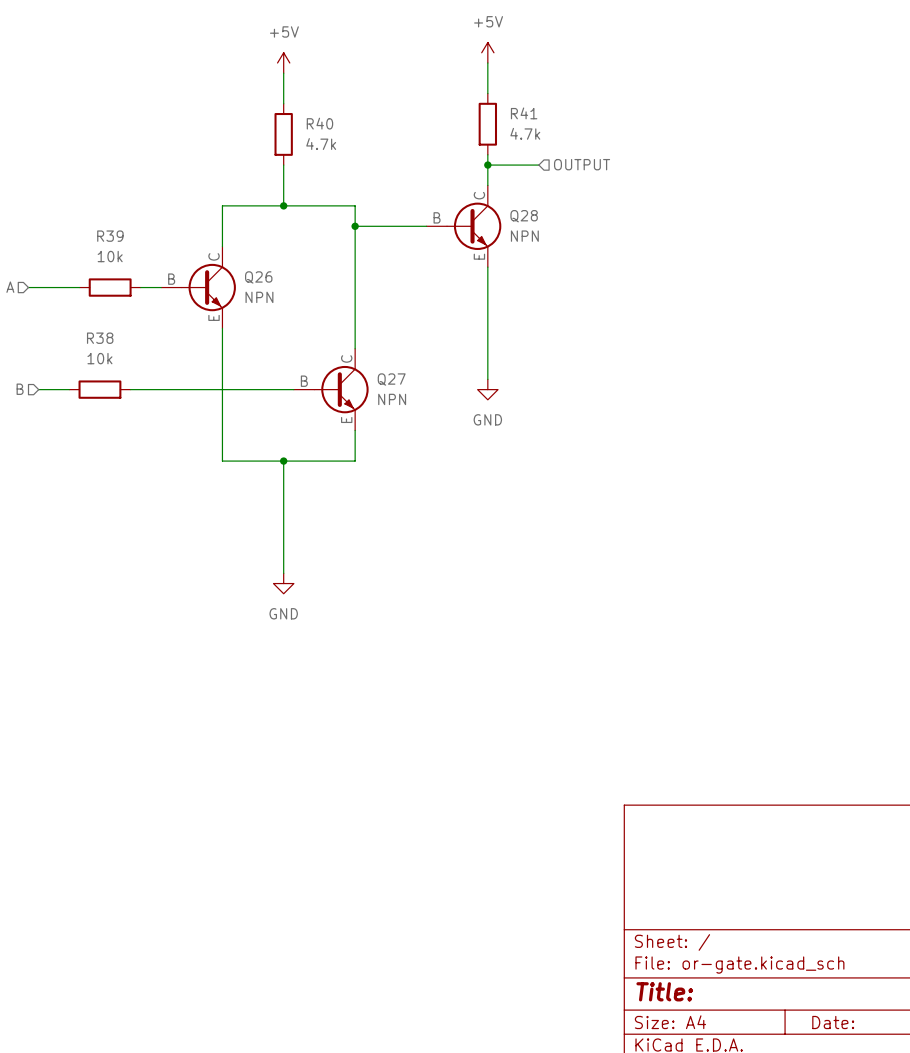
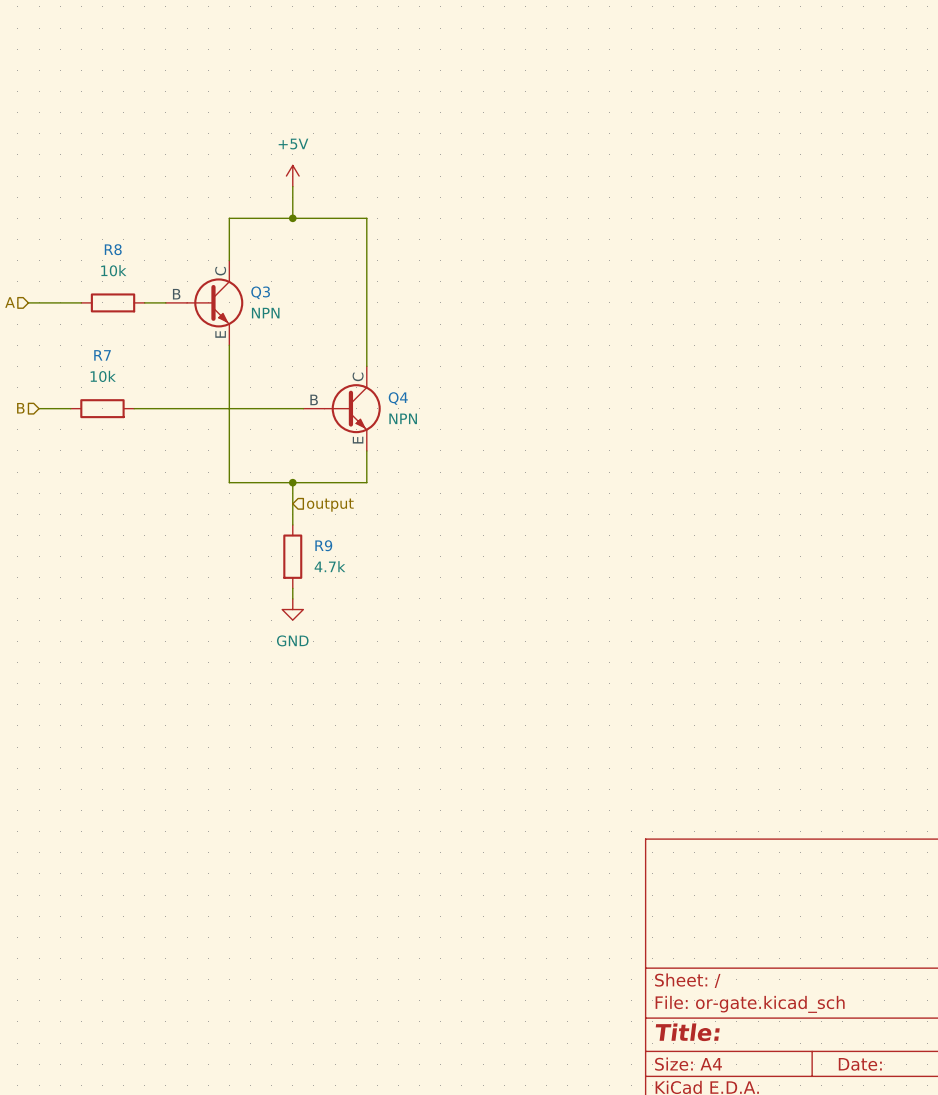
power symbol: +5V (487, 52) -> none
power symbol position: +5V (283, 62) -> +5V (292, 176)
wire: (487, 62) (487, 93) -> none
wire: (283, 73) (283, 103) -> none
R41: 4.7k (487, 124) -> none
R40: 4.7k (283, 134) -> none
wire: (487, 154) (487, 185) -> none
hierarchical label: OUTPUT (582, 164) -> none
wire: (487, 165) (538, 165) -> none
junction: (487, 165) -> none
wire: (355, 226) (426, 226) -> none
junction: (355, 226) -> none
Q28: NPN (463, 226) -> none
R39 name: R39 (110, 236) -> R8 (113, 249)
wire: (487, 267) (487, 379) -> none
Q26 name: Q26 (258, 277) -> Q3 (260, 292)
R38 name: R38 (100, 338) -> R7 (102, 355)
Q27 name: Q27 (391, 379) -> Q4 (398, 398)
power symbol: GND (487, 389) -> none
hierarchical label: none -> output (330, 505)
wire: (283, 501) (283, 563) -> none
R9: none -> 4.7k (292, 556)

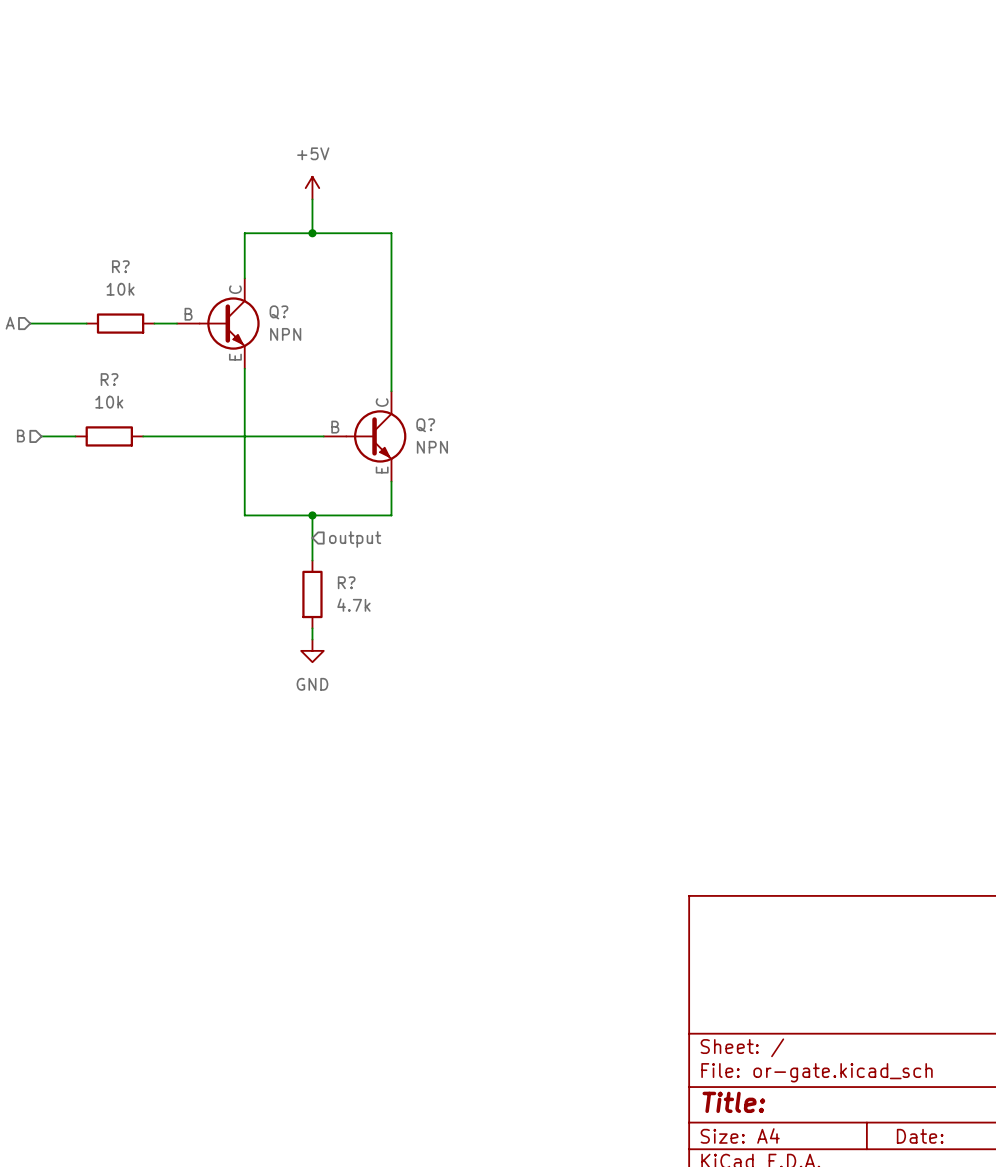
R8 name: R8 (113, 249) -> R? (120, 266)
Q3 name: Q3 (260, 292) -> Q? (278, 312)
R7 name: R7 (102, 355) -> R? (109, 379)
Q4 name: Q4 (398, 398) -> Q? (425, 425)
R9 name: R9 (323, 545) -> R? (346, 582)

